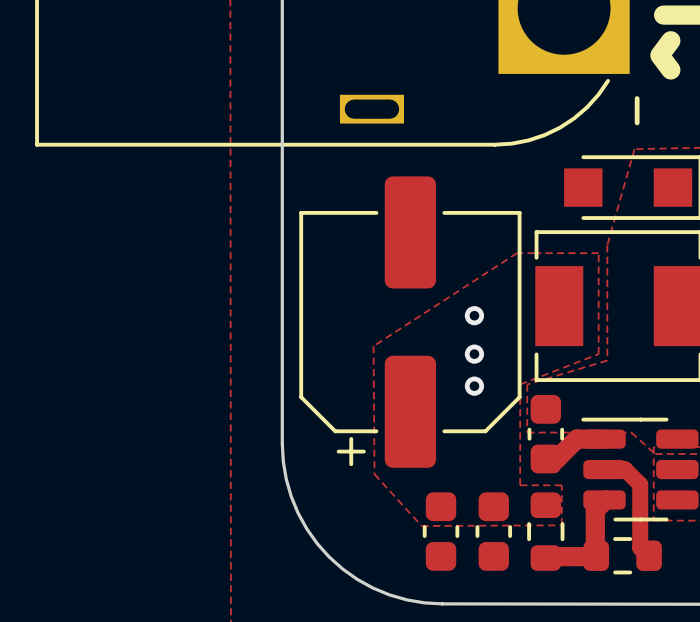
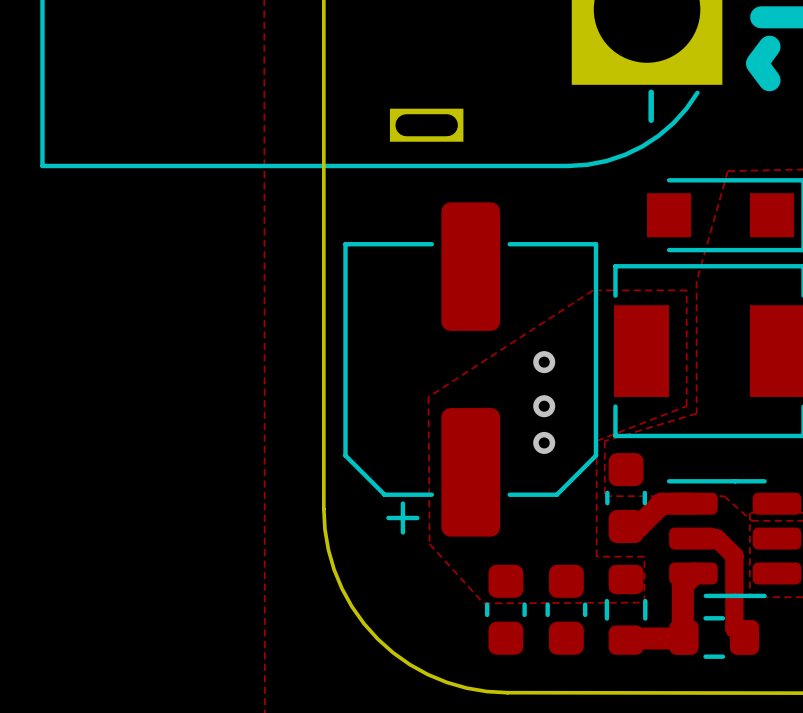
part text position: - (637, 110) -> - (651, 106)

